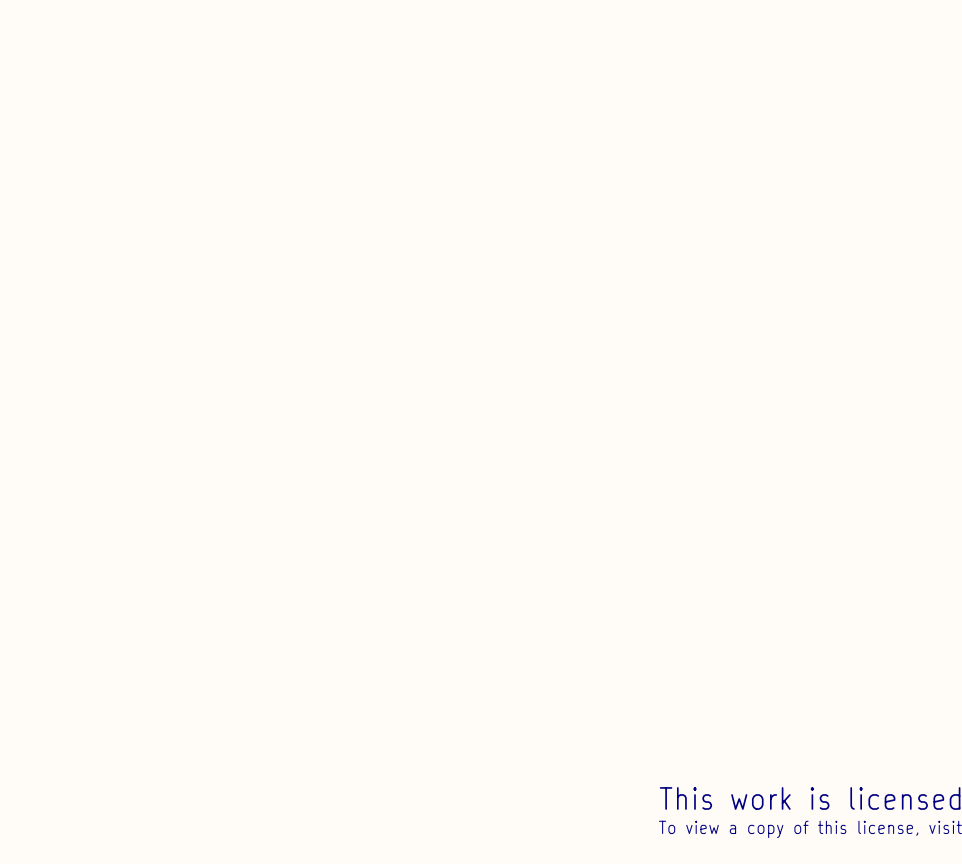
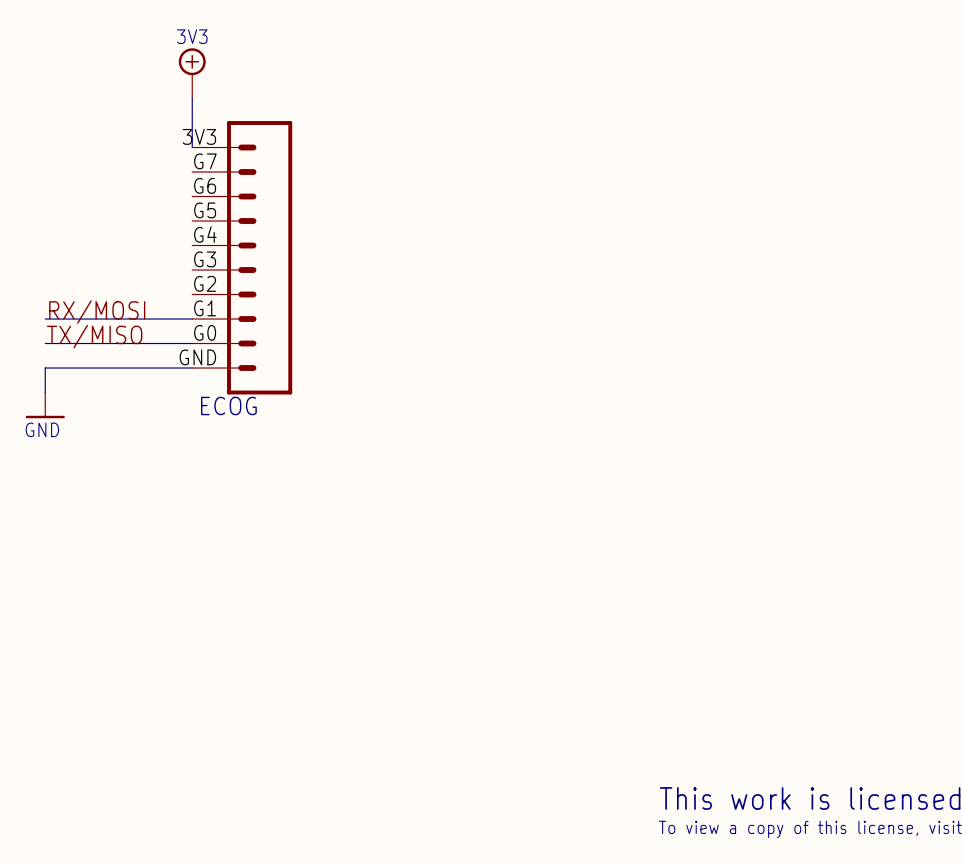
power symbol: none -> 3V3 (192, 73)
wire: none -> (192, 98) (192, 147)
ECOG: none -> (242, 257)
label: none -> RX/MOSI (97, 312)
wire: none -> (45, 319) (192, 319)
label: none -> TX/MISO (94, 336)
wire: none -> (45, 343) (192, 343)
wire: none -> (192, 368) (45, 368) (45, 392)
power symbol: none -> GND (45, 405)

